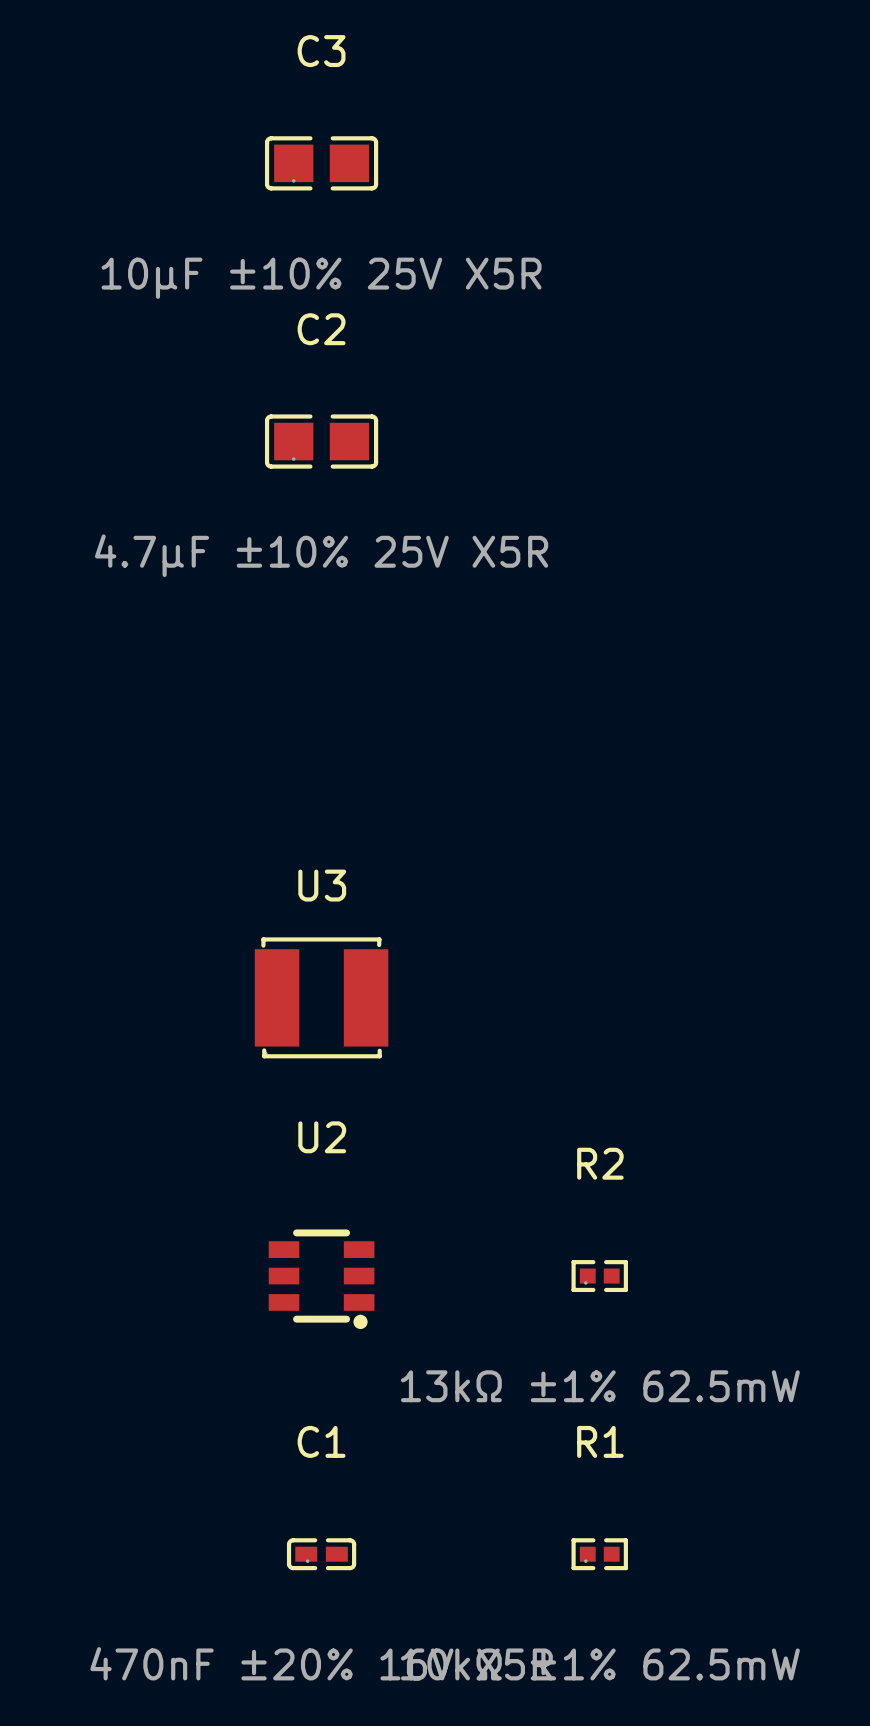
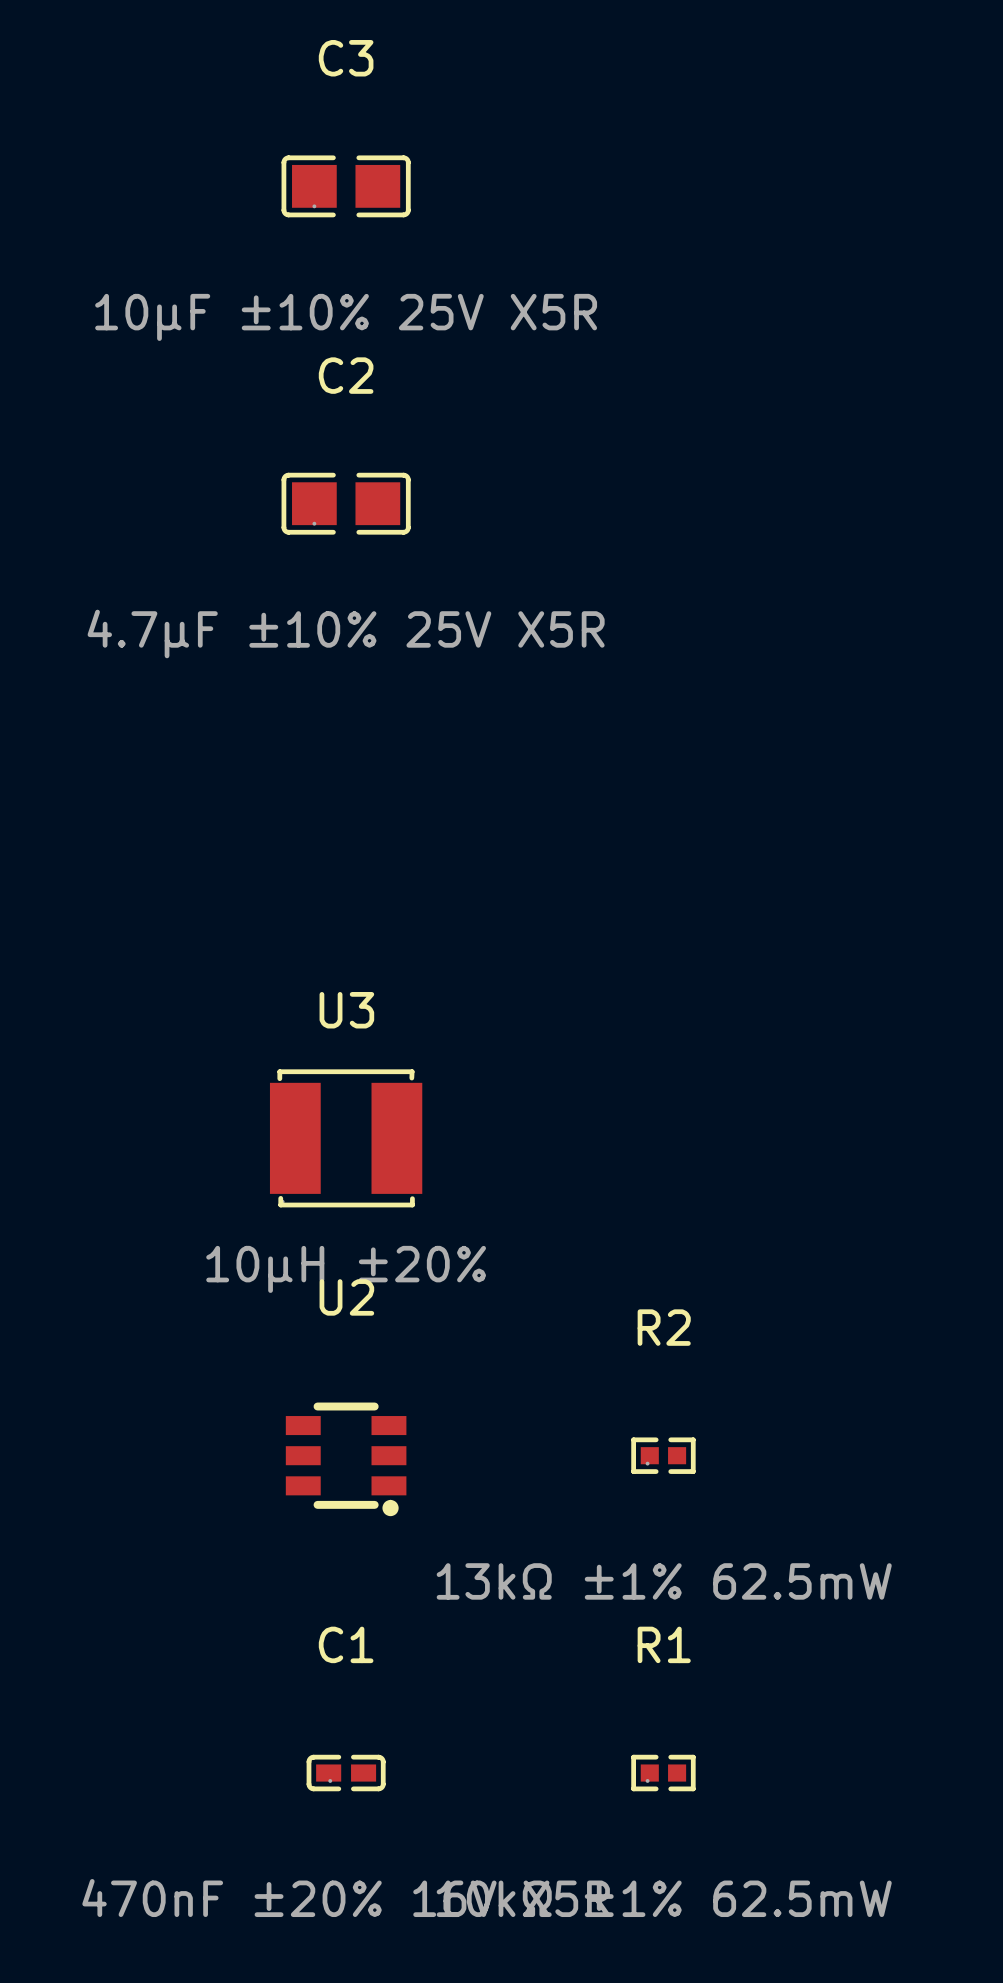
U3 value: none -> 10µH ±20% (346, 1269)

